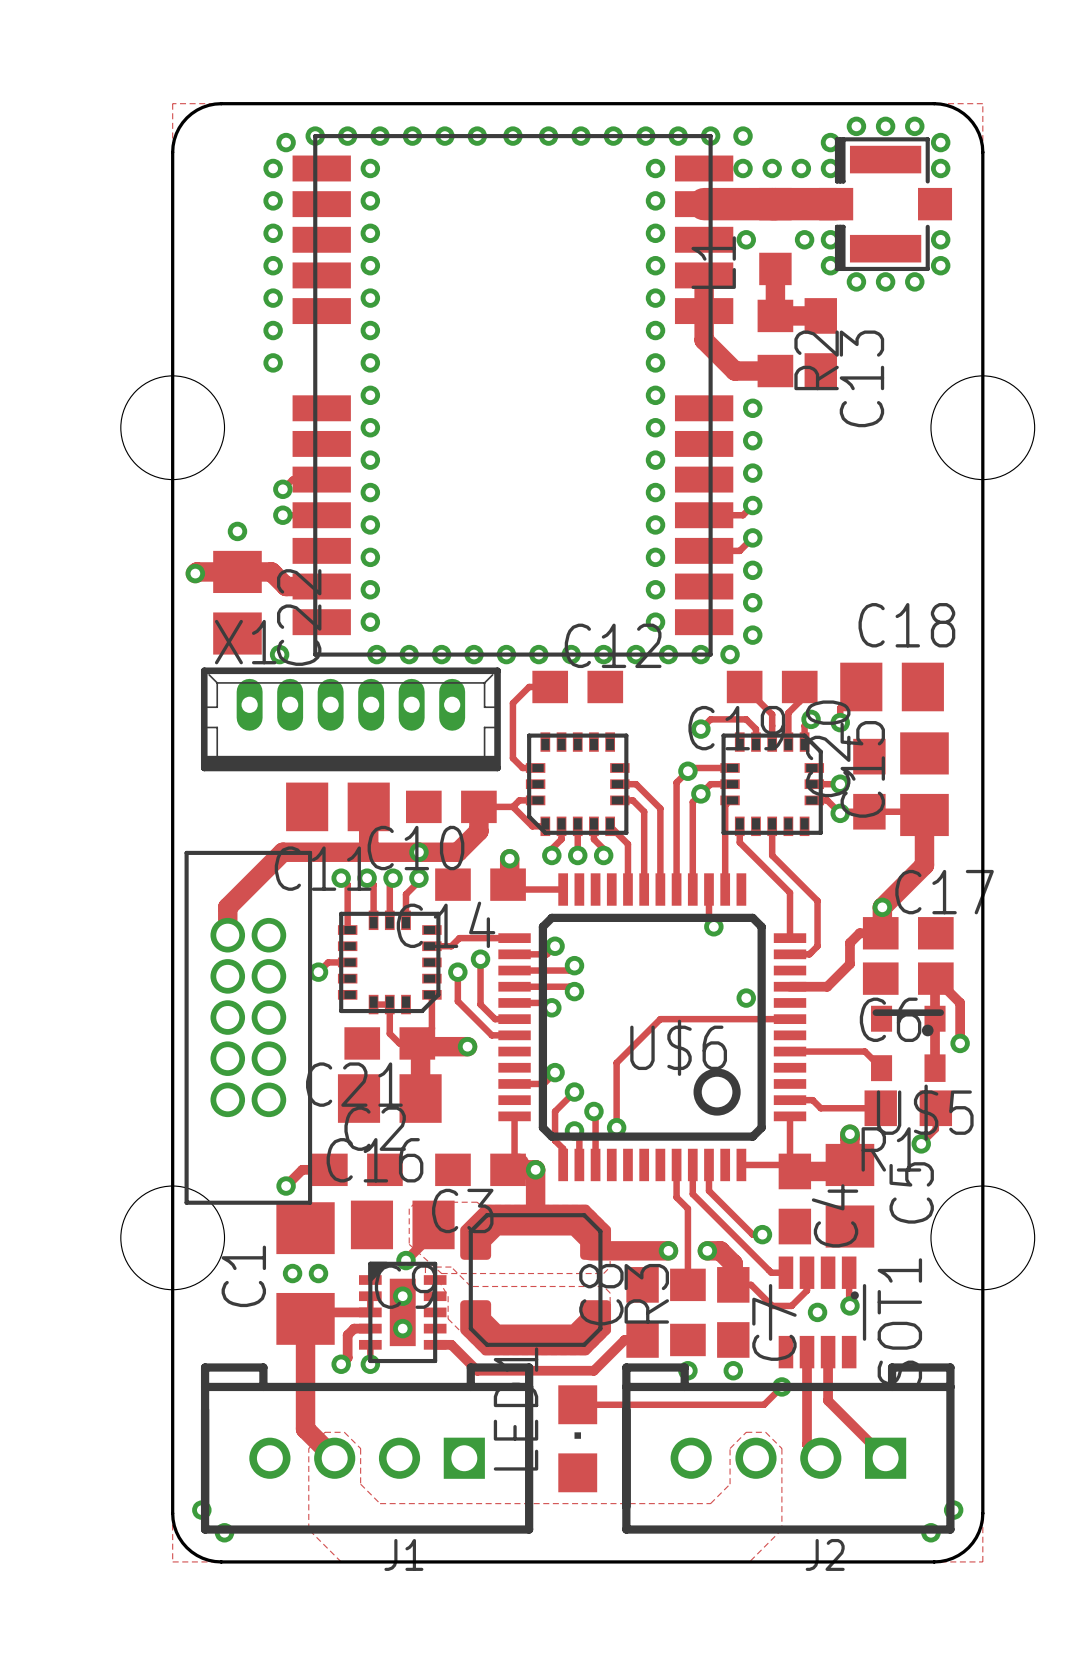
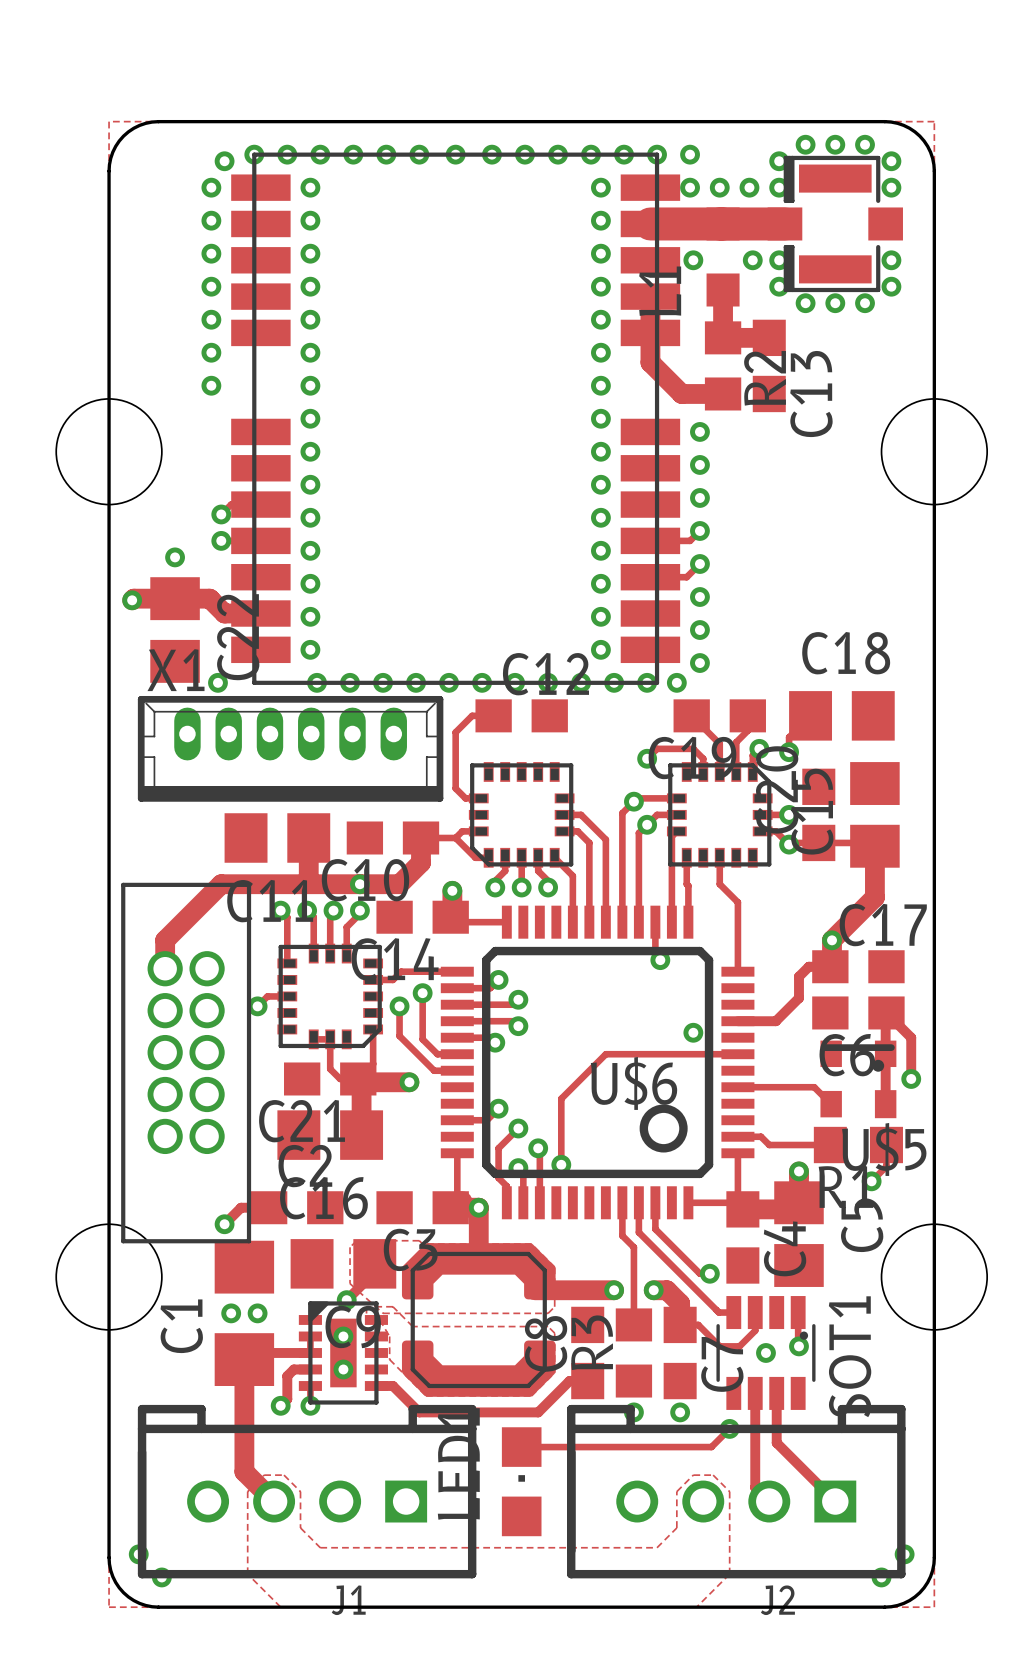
track: (739, 842) (790, 892) -> (719, 884) (737, 902) (737, 925)
track: none -> (686, 874) (688, 922)
track: (772, 852) (772, 855) (817, 900) (817, 946) (809, 954) (790, 954) -> none

